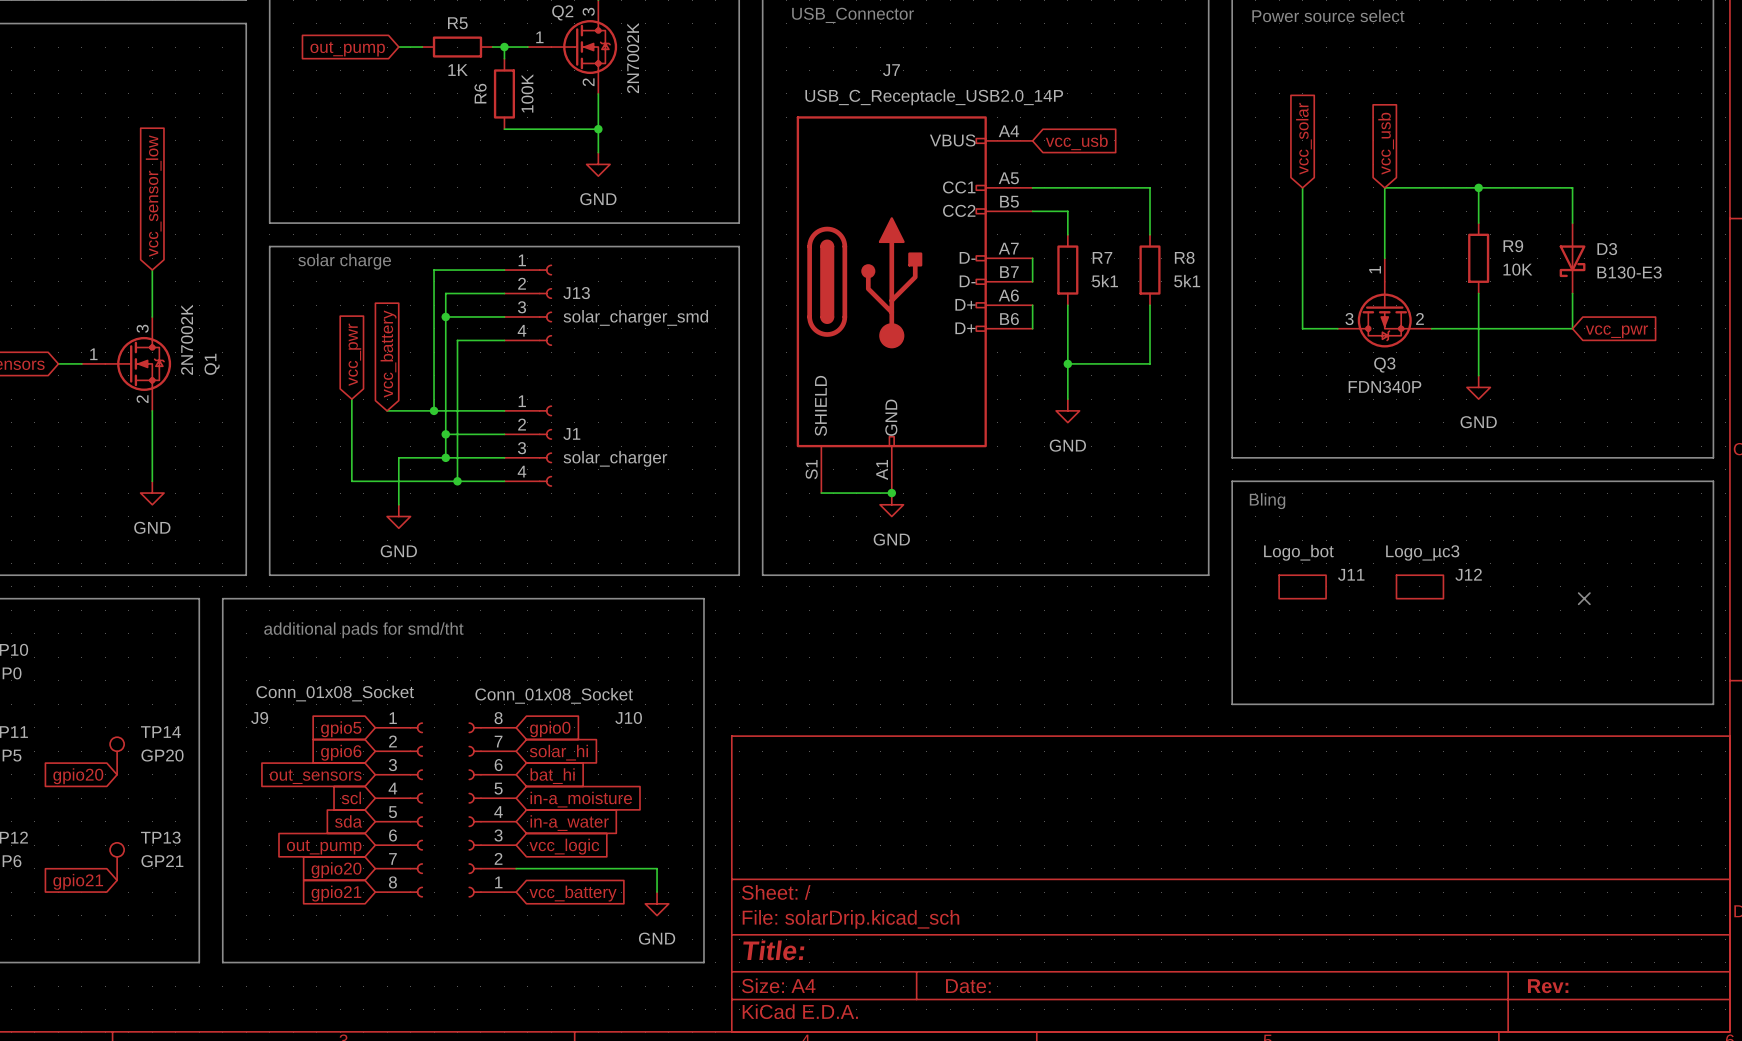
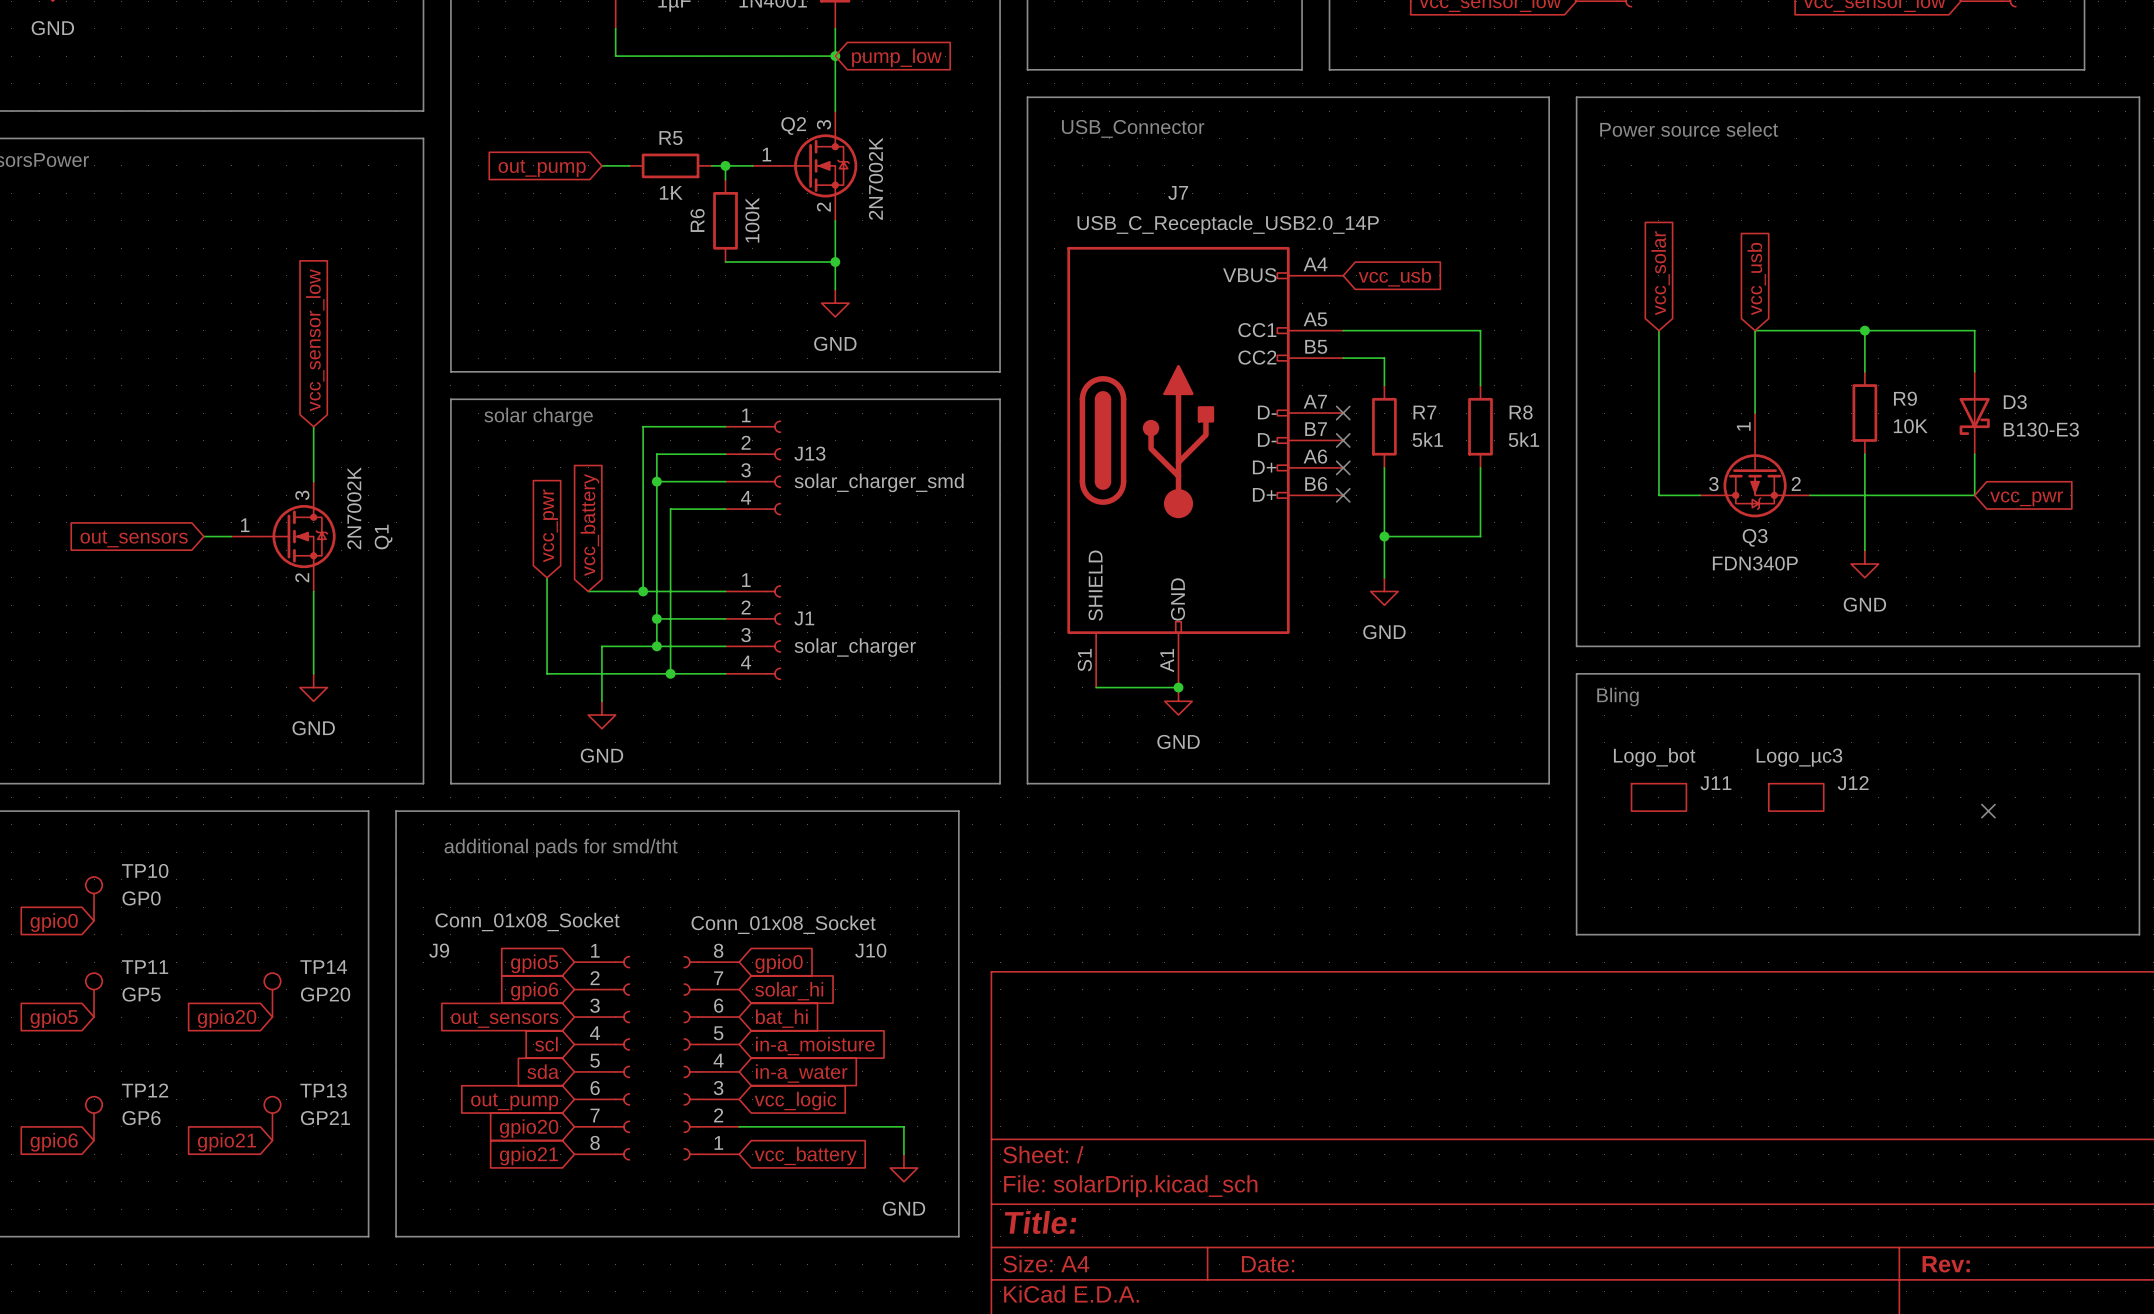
wire: (1032, 258) (1032, 281) -> none
no-connect mark: none -> (1343, 413)
no-connect mark: none -> (1343, 440)
wire: (1032, 305) (1032, 328) -> none
no-connect mark: none -> (1343, 467)
no-connect mark: none -> (1343, 495)

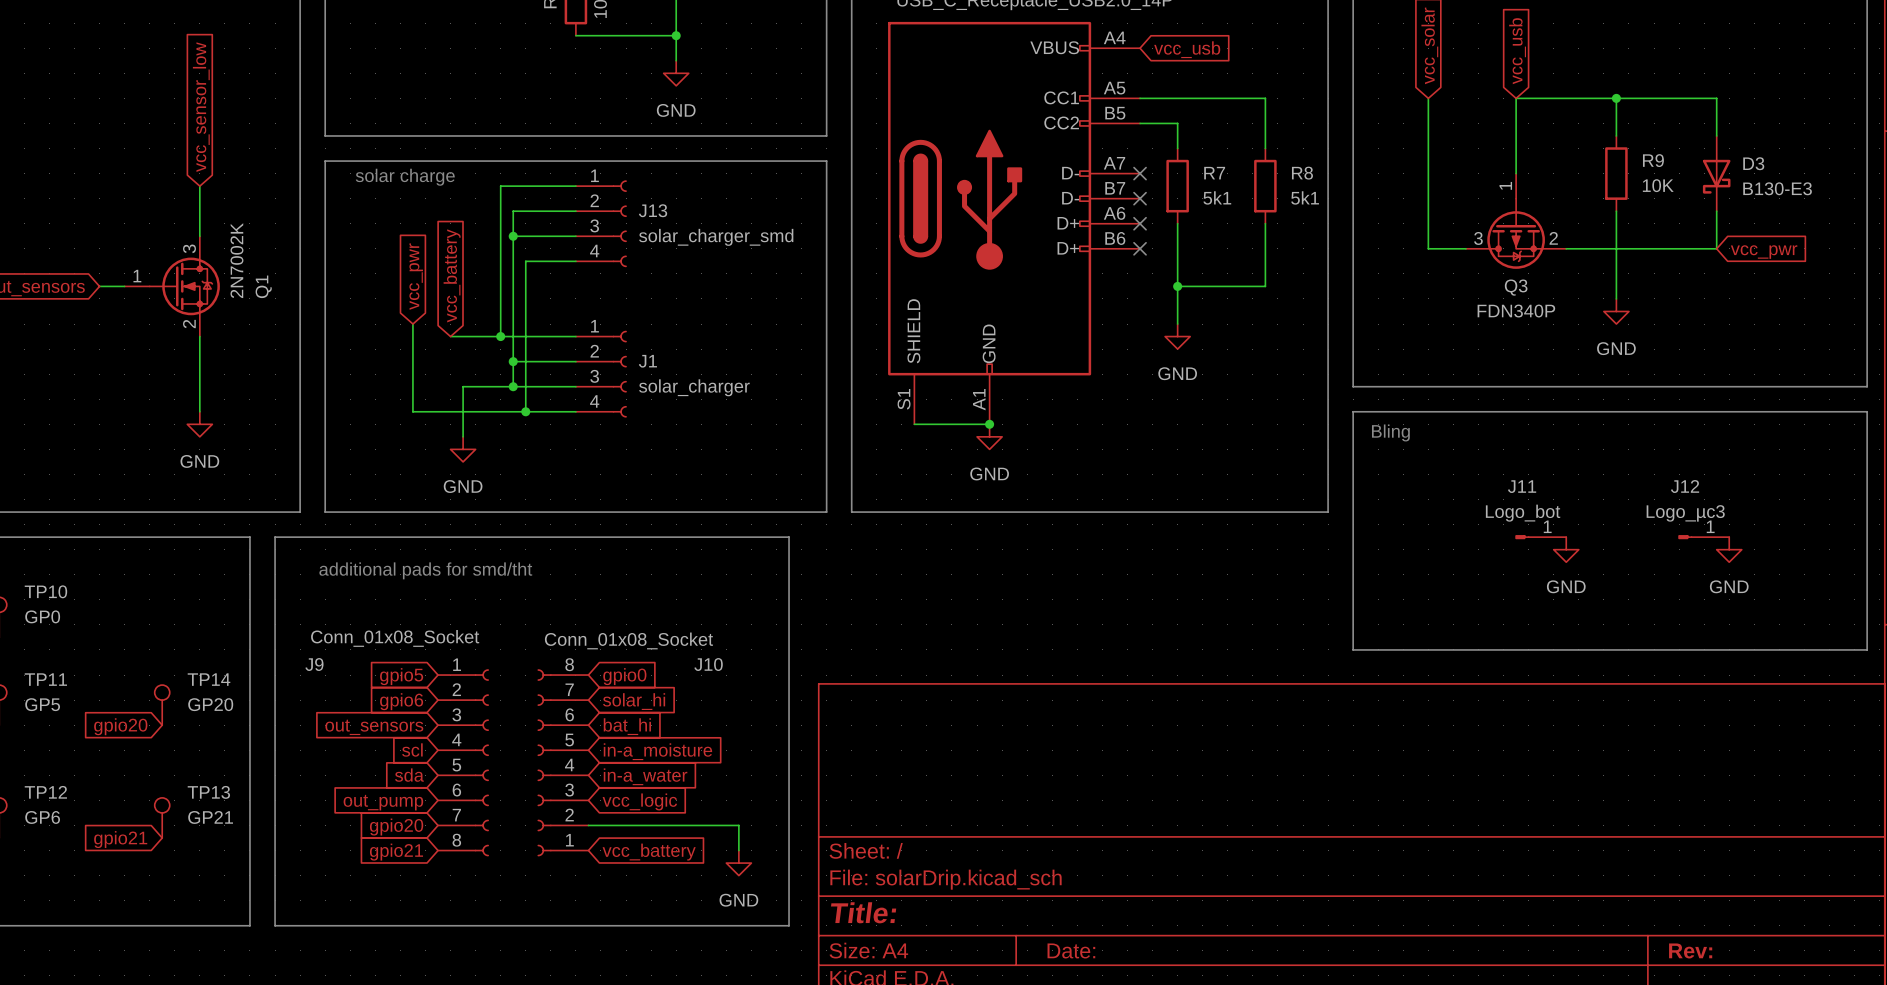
J11 value position: Logo_bot (1654, 757) -> Logo_bot (1523, 513)
J12 value position: Logo_µc3 (1799, 757) -> Logo_µc3 (1685, 513)
J11 symbol: [1631, 783, 1687, 812] -> [1515, 535, 1567, 540]
J11 name position: J11 (1715, 783) -> J11 (1522, 486)
J12 symbol: [1768, 783, 1824, 812] -> [1678, 535, 1730, 540]
J12 name position: J12 (1853, 783) -> J12 (1685, 486)
no-connect mark: (1988, 811) -> none
power symbol: none -> GND (1566, 549)
power symbol: none -> GND (1729, 549)

